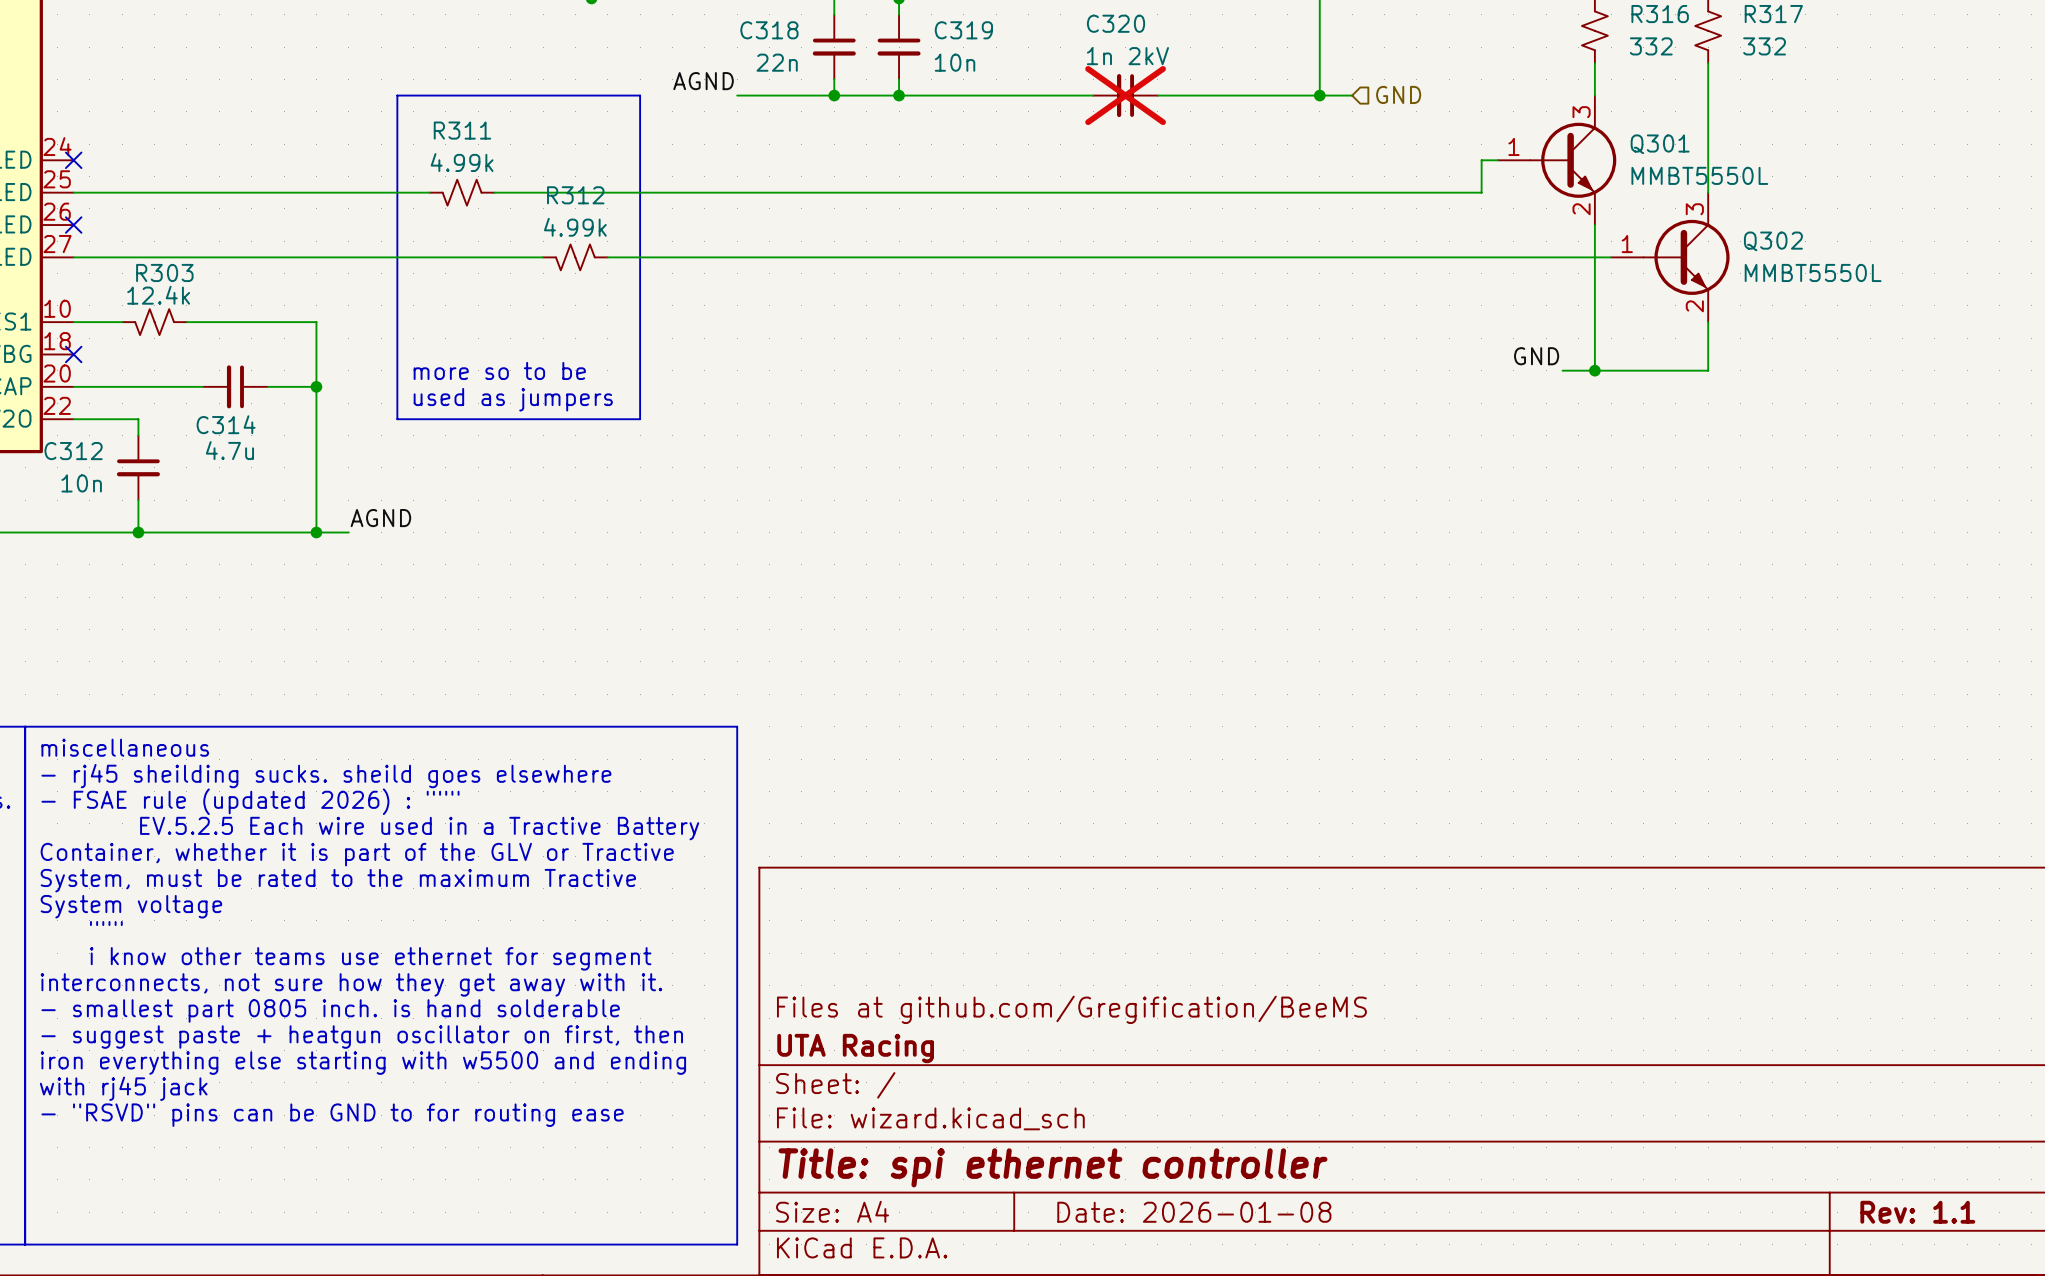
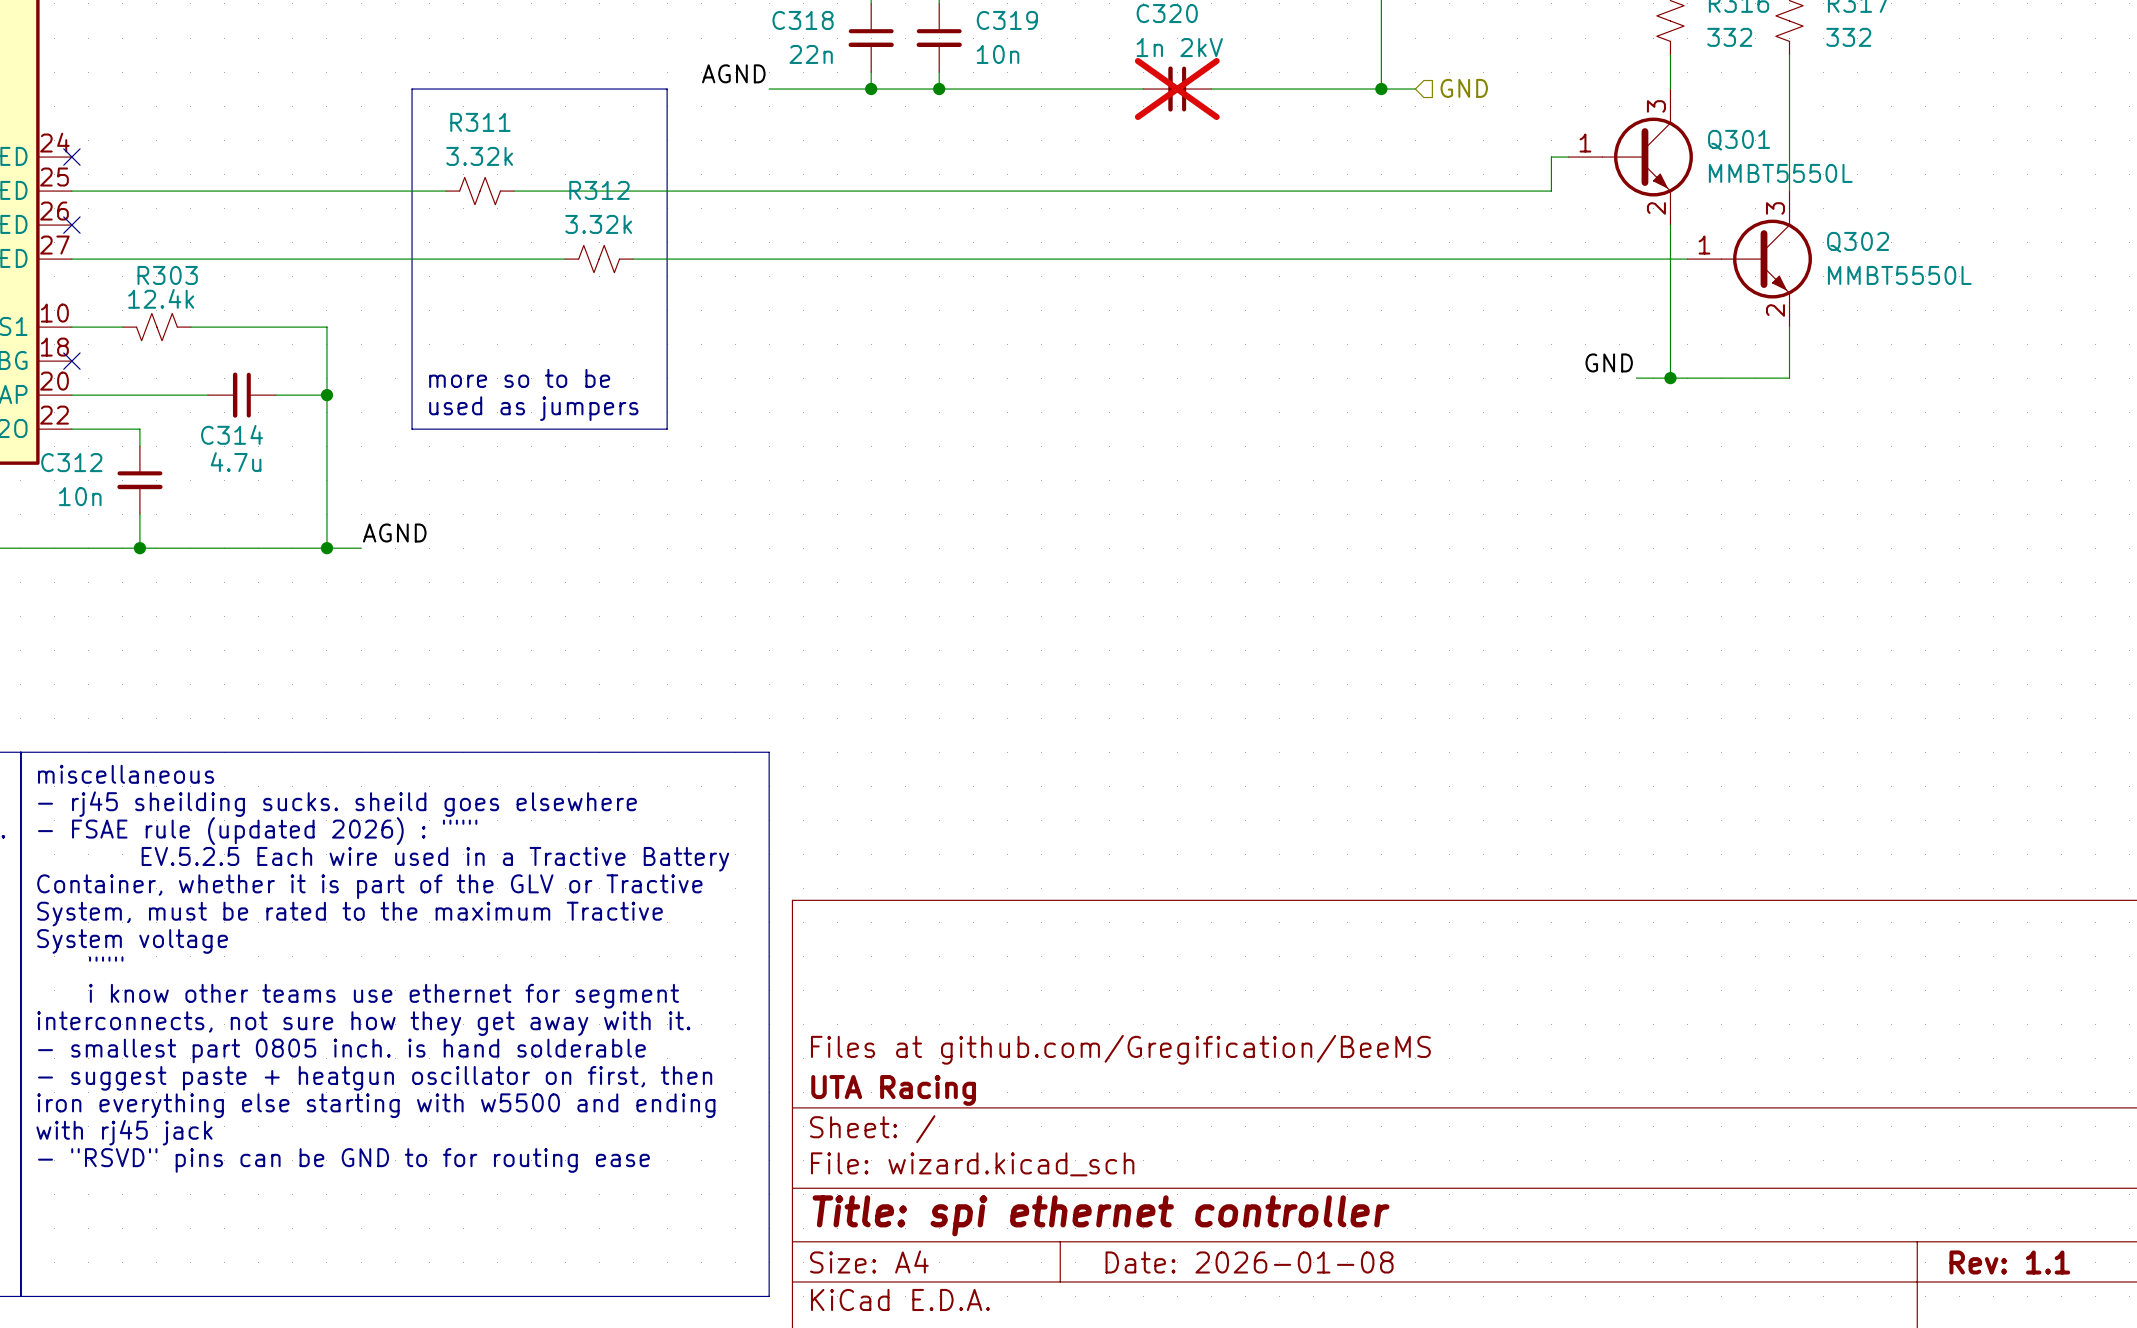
R311 value: 4.99k (462, 162) -> 3.32k (479, 156)
R311 flip: as is (462, 192) -> left-right (480, 191)
R312 value: 4.99k (575, 227) -> 3.32k (598, 224)
R312 flip: as is (575, 257) -> left-right (599, 259)

